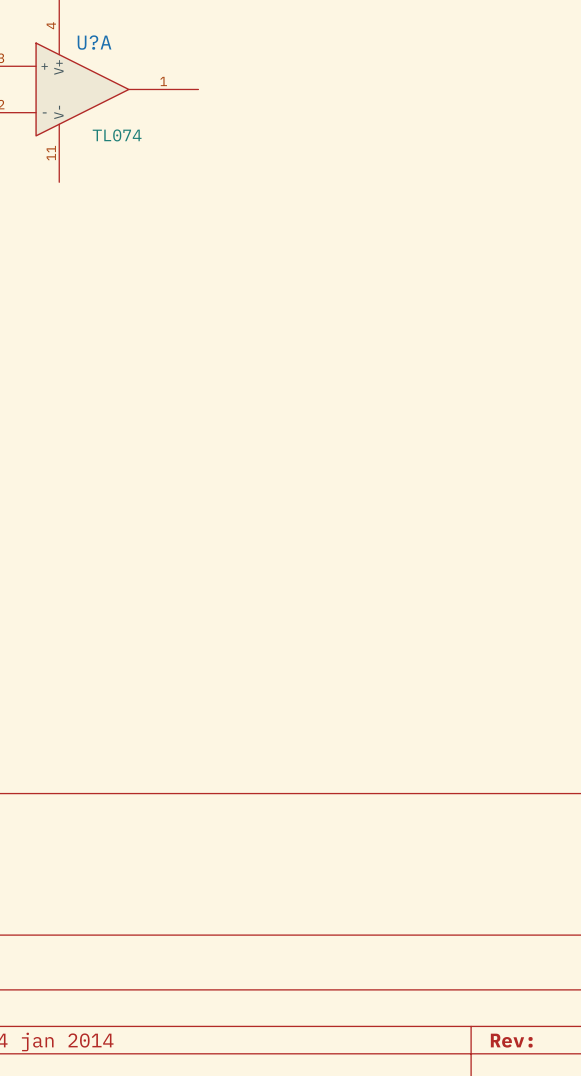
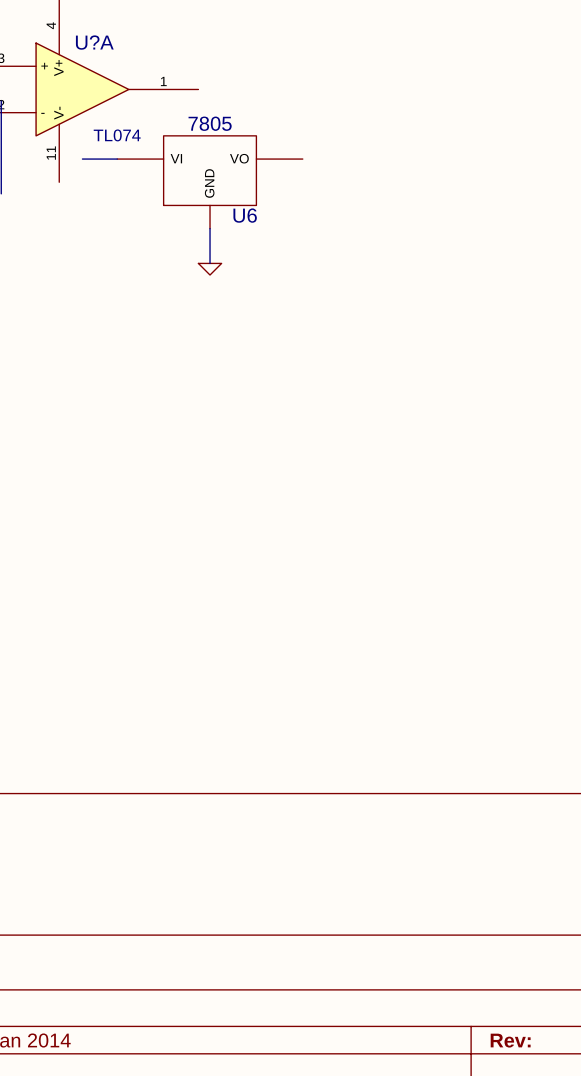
wire: none -> (1, 101) (1, 193)
wire: none -> (82, 159) (117, 159)
U6: none -> 7805 (210, 182)
wire: none -> (210, 228) (210, 263)
power symbol: none -> (210, 269)

